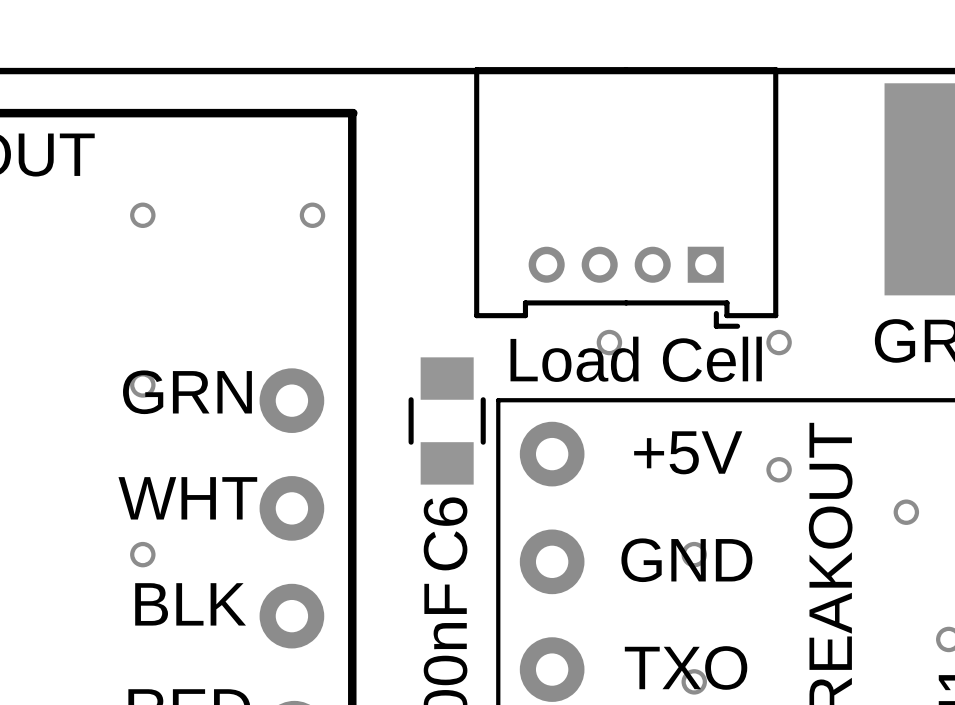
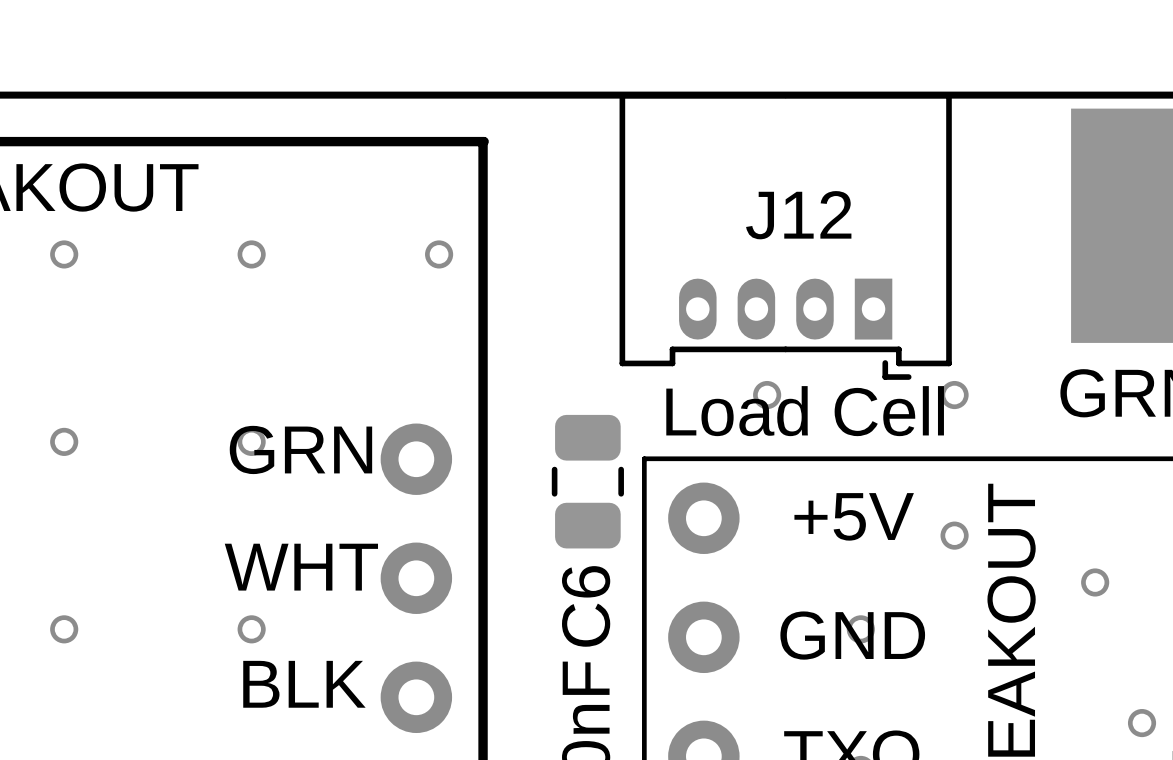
part: Load Cell (626, 197) -> none
J12: none -> Load Cell (785, 236)
C6 footprint: [408, 357, 486, 485] -> [551, 414, 624, 549]

